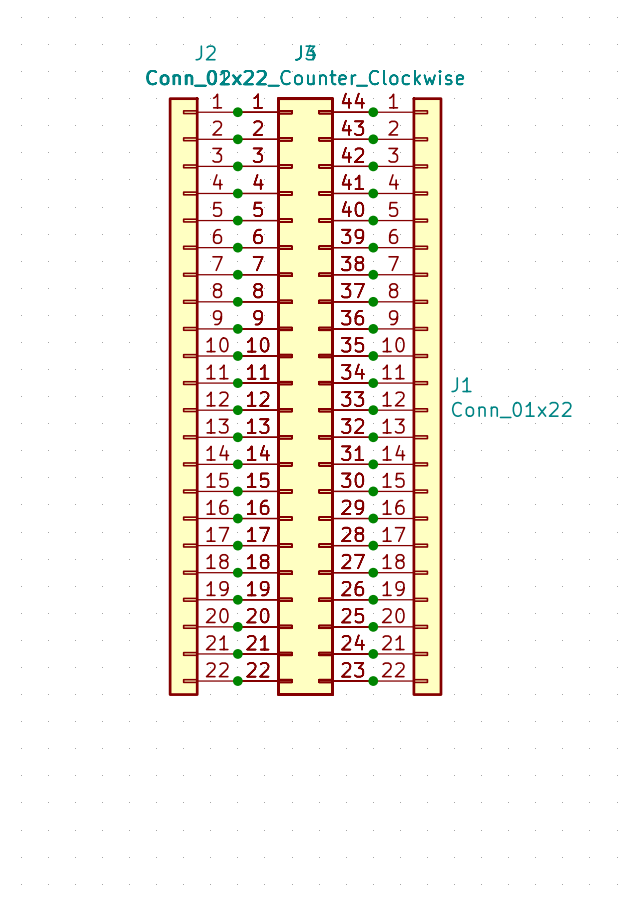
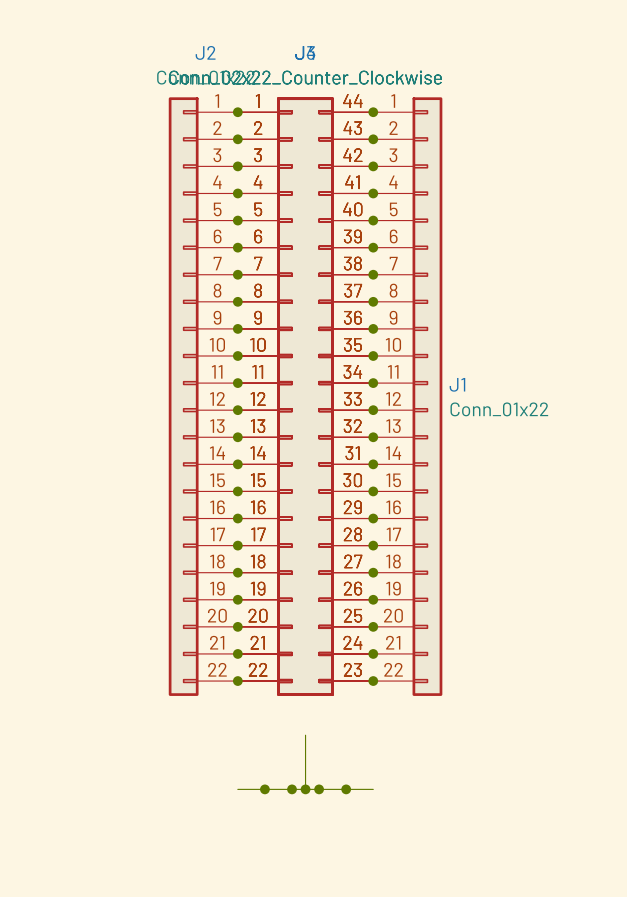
wire: none -> (305, 735) (305, 789)
wire: none -> (237, 789) (373, 789)
junction: none -> (264, 789)
junction: none -> (292, 789)
junction: none -> (305, 789)
junction: none -> (319, 789)
junction: none -> (346, 789)

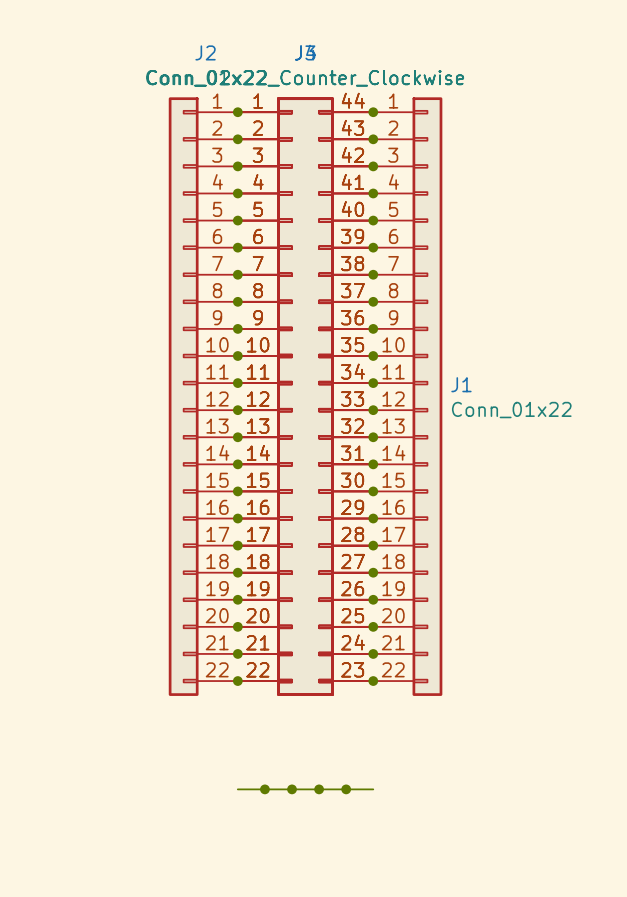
wire: (305, 735) (305, 789) -> none
junction: (305, 789) -> none

